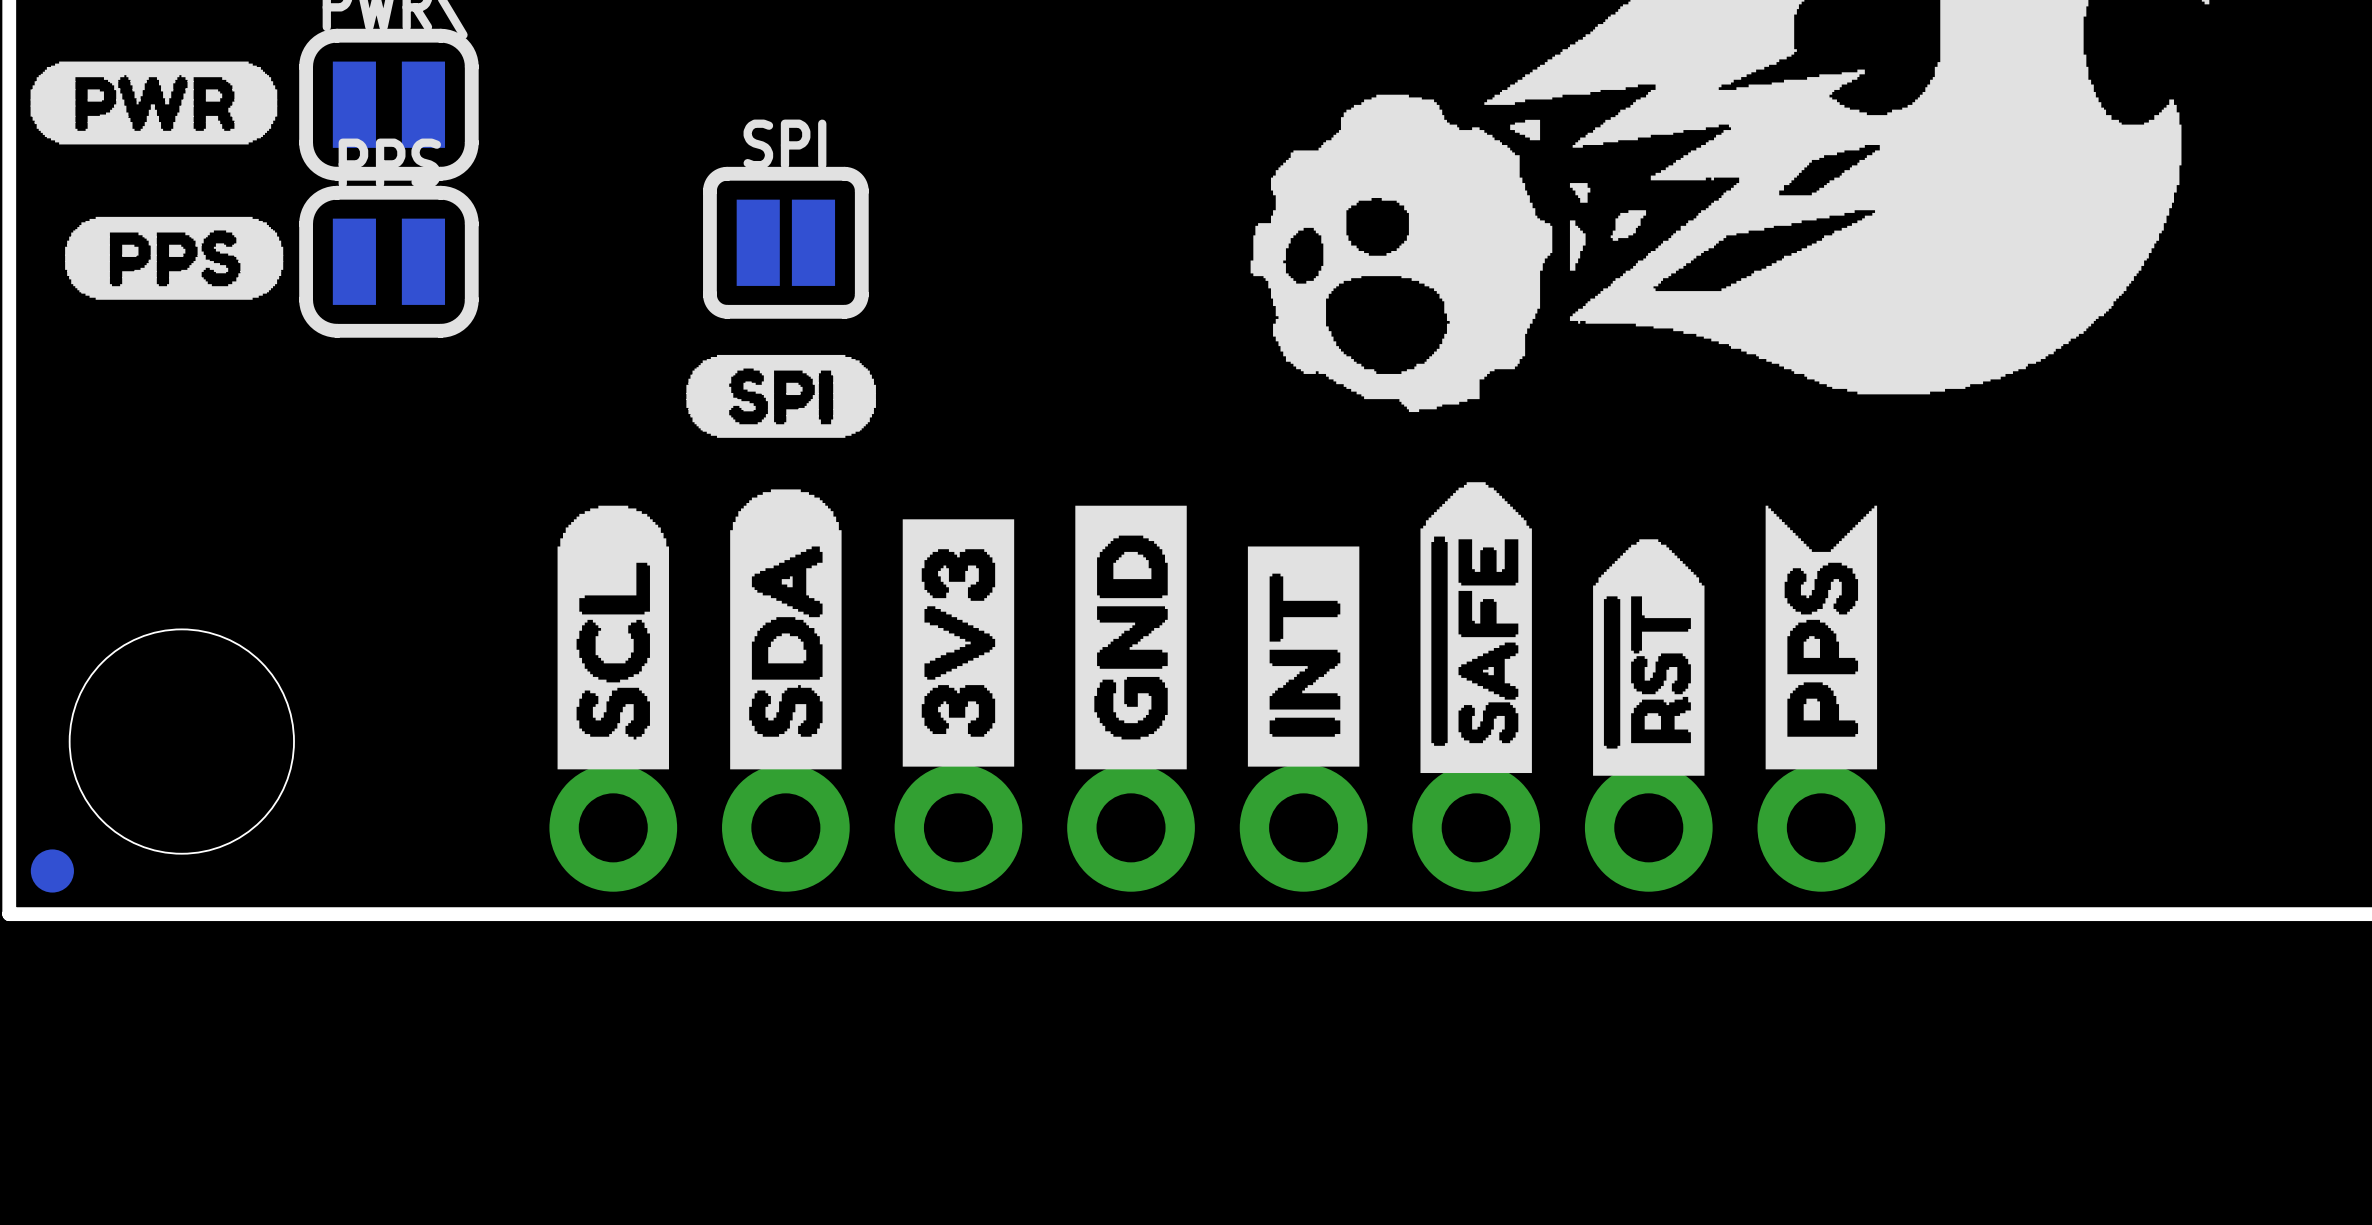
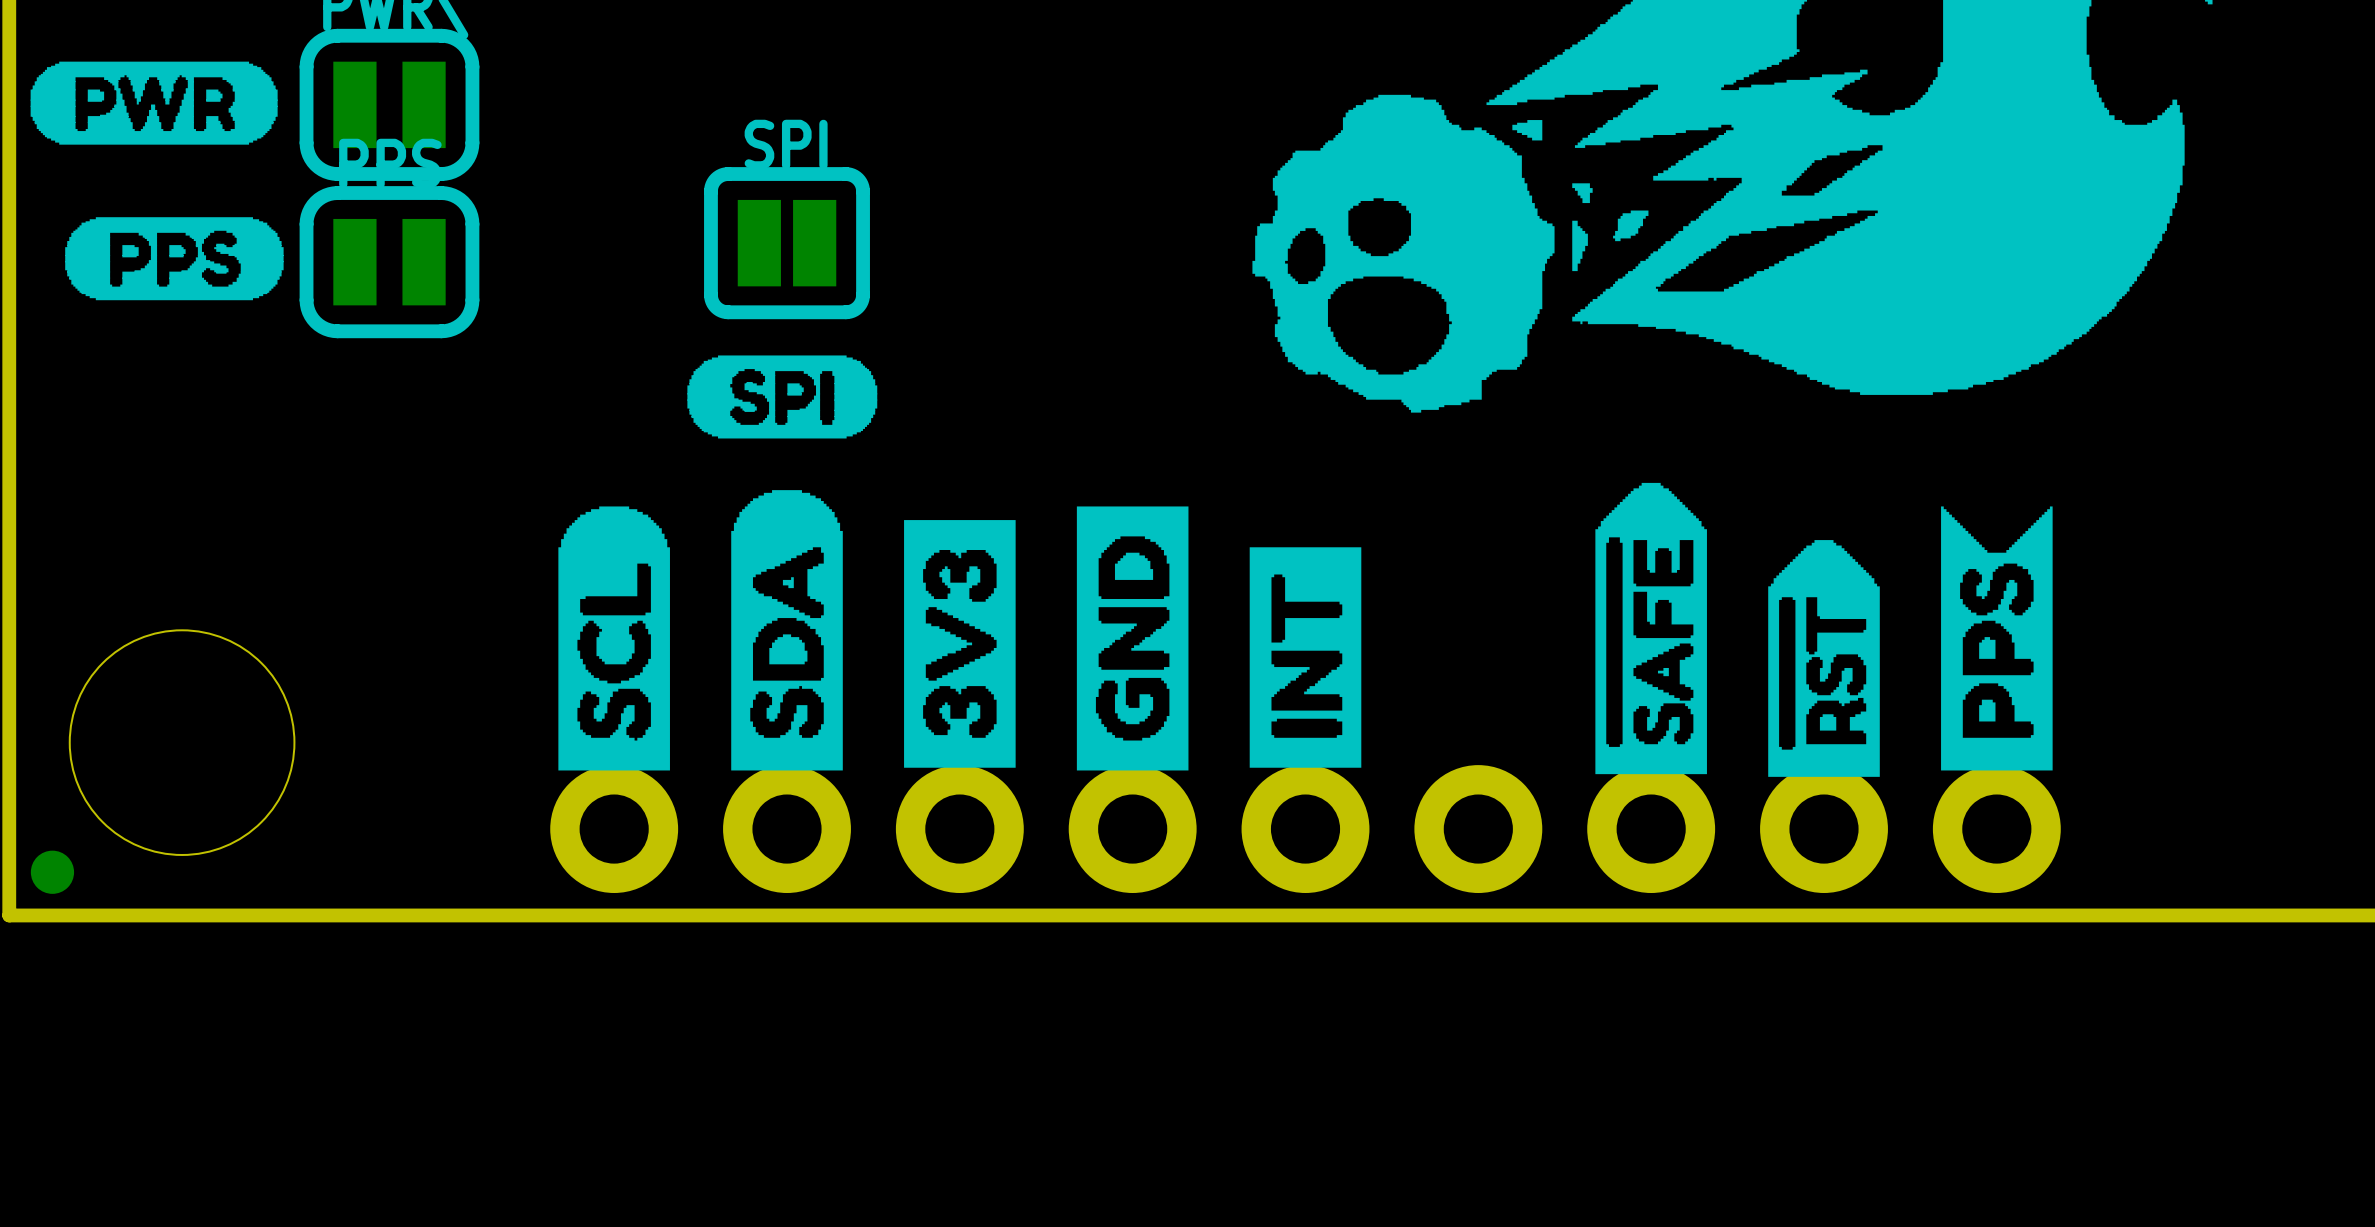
drawing position: (1476, 627) -> (1651, 628)
drawing position: (1821, 637) -> (1996, 638)
drawing position: (1648, 657) -> (1824, 658)
part: (1562, 827) -> none
part: none -> (1651, 829)

